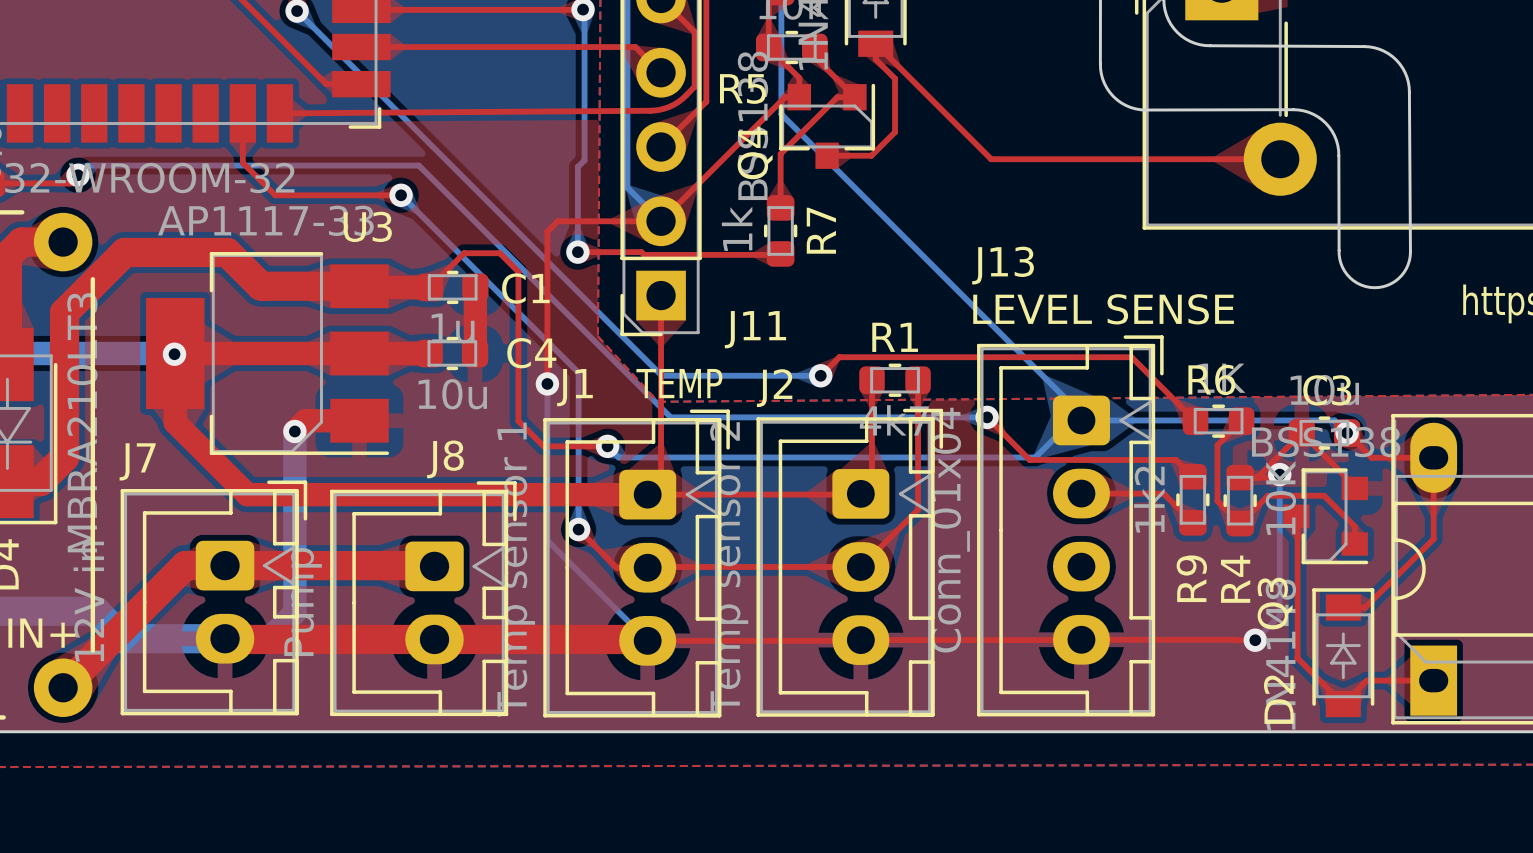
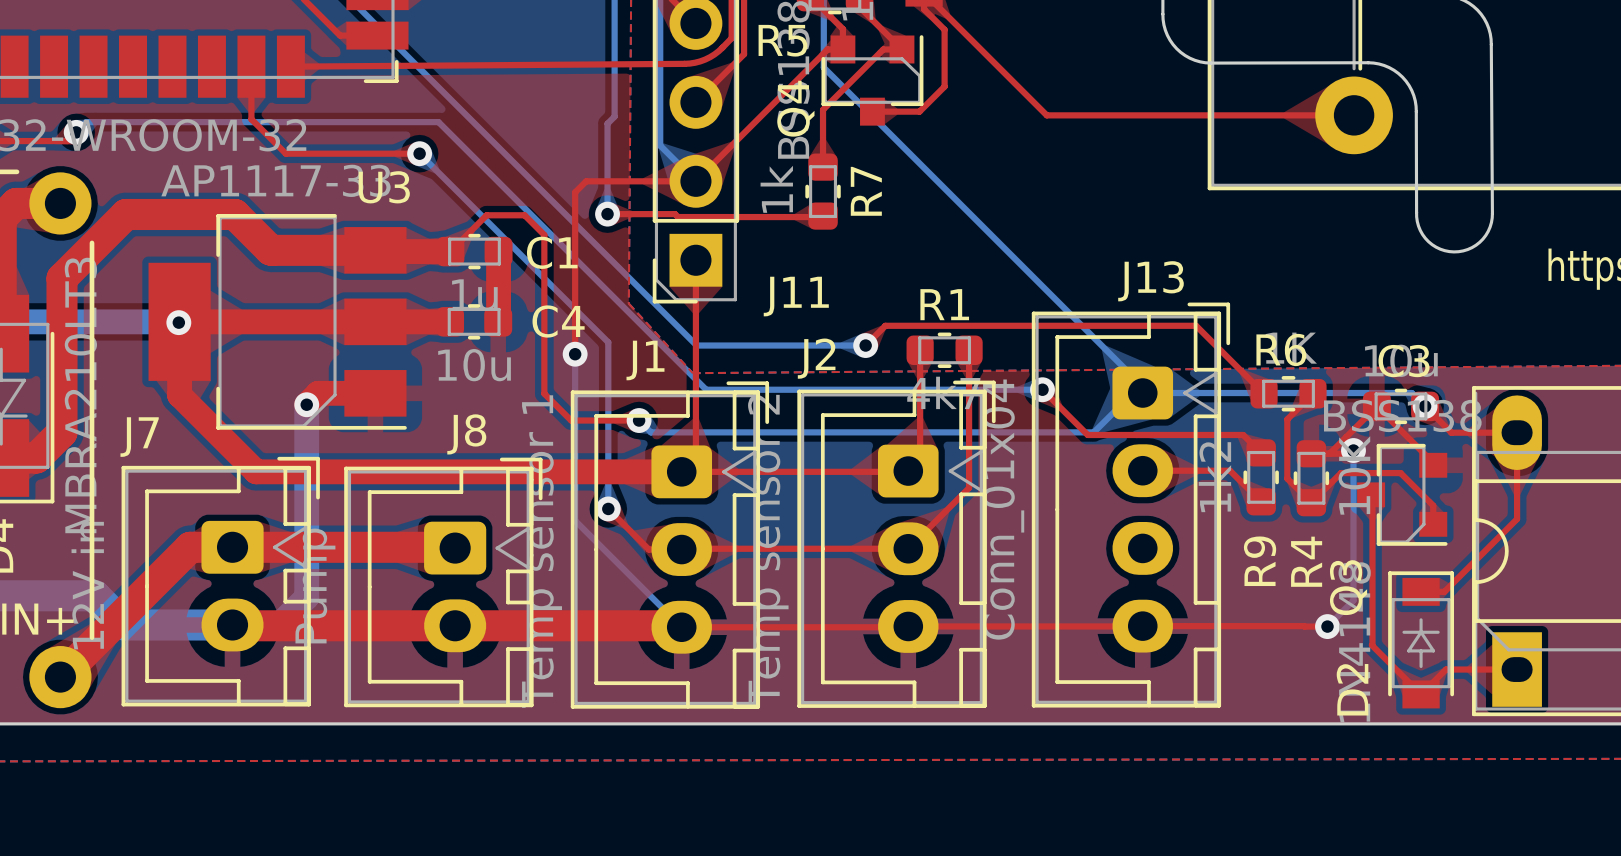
J13 name position: J13 (1003, 265) -> J13 (1151, 281)
text: LEVEL SENSE (1103, 309) -> none
text: TEMP (679, 383) -> none
J1 name position: J1 (574, 387) -> J1 (645, 360)

